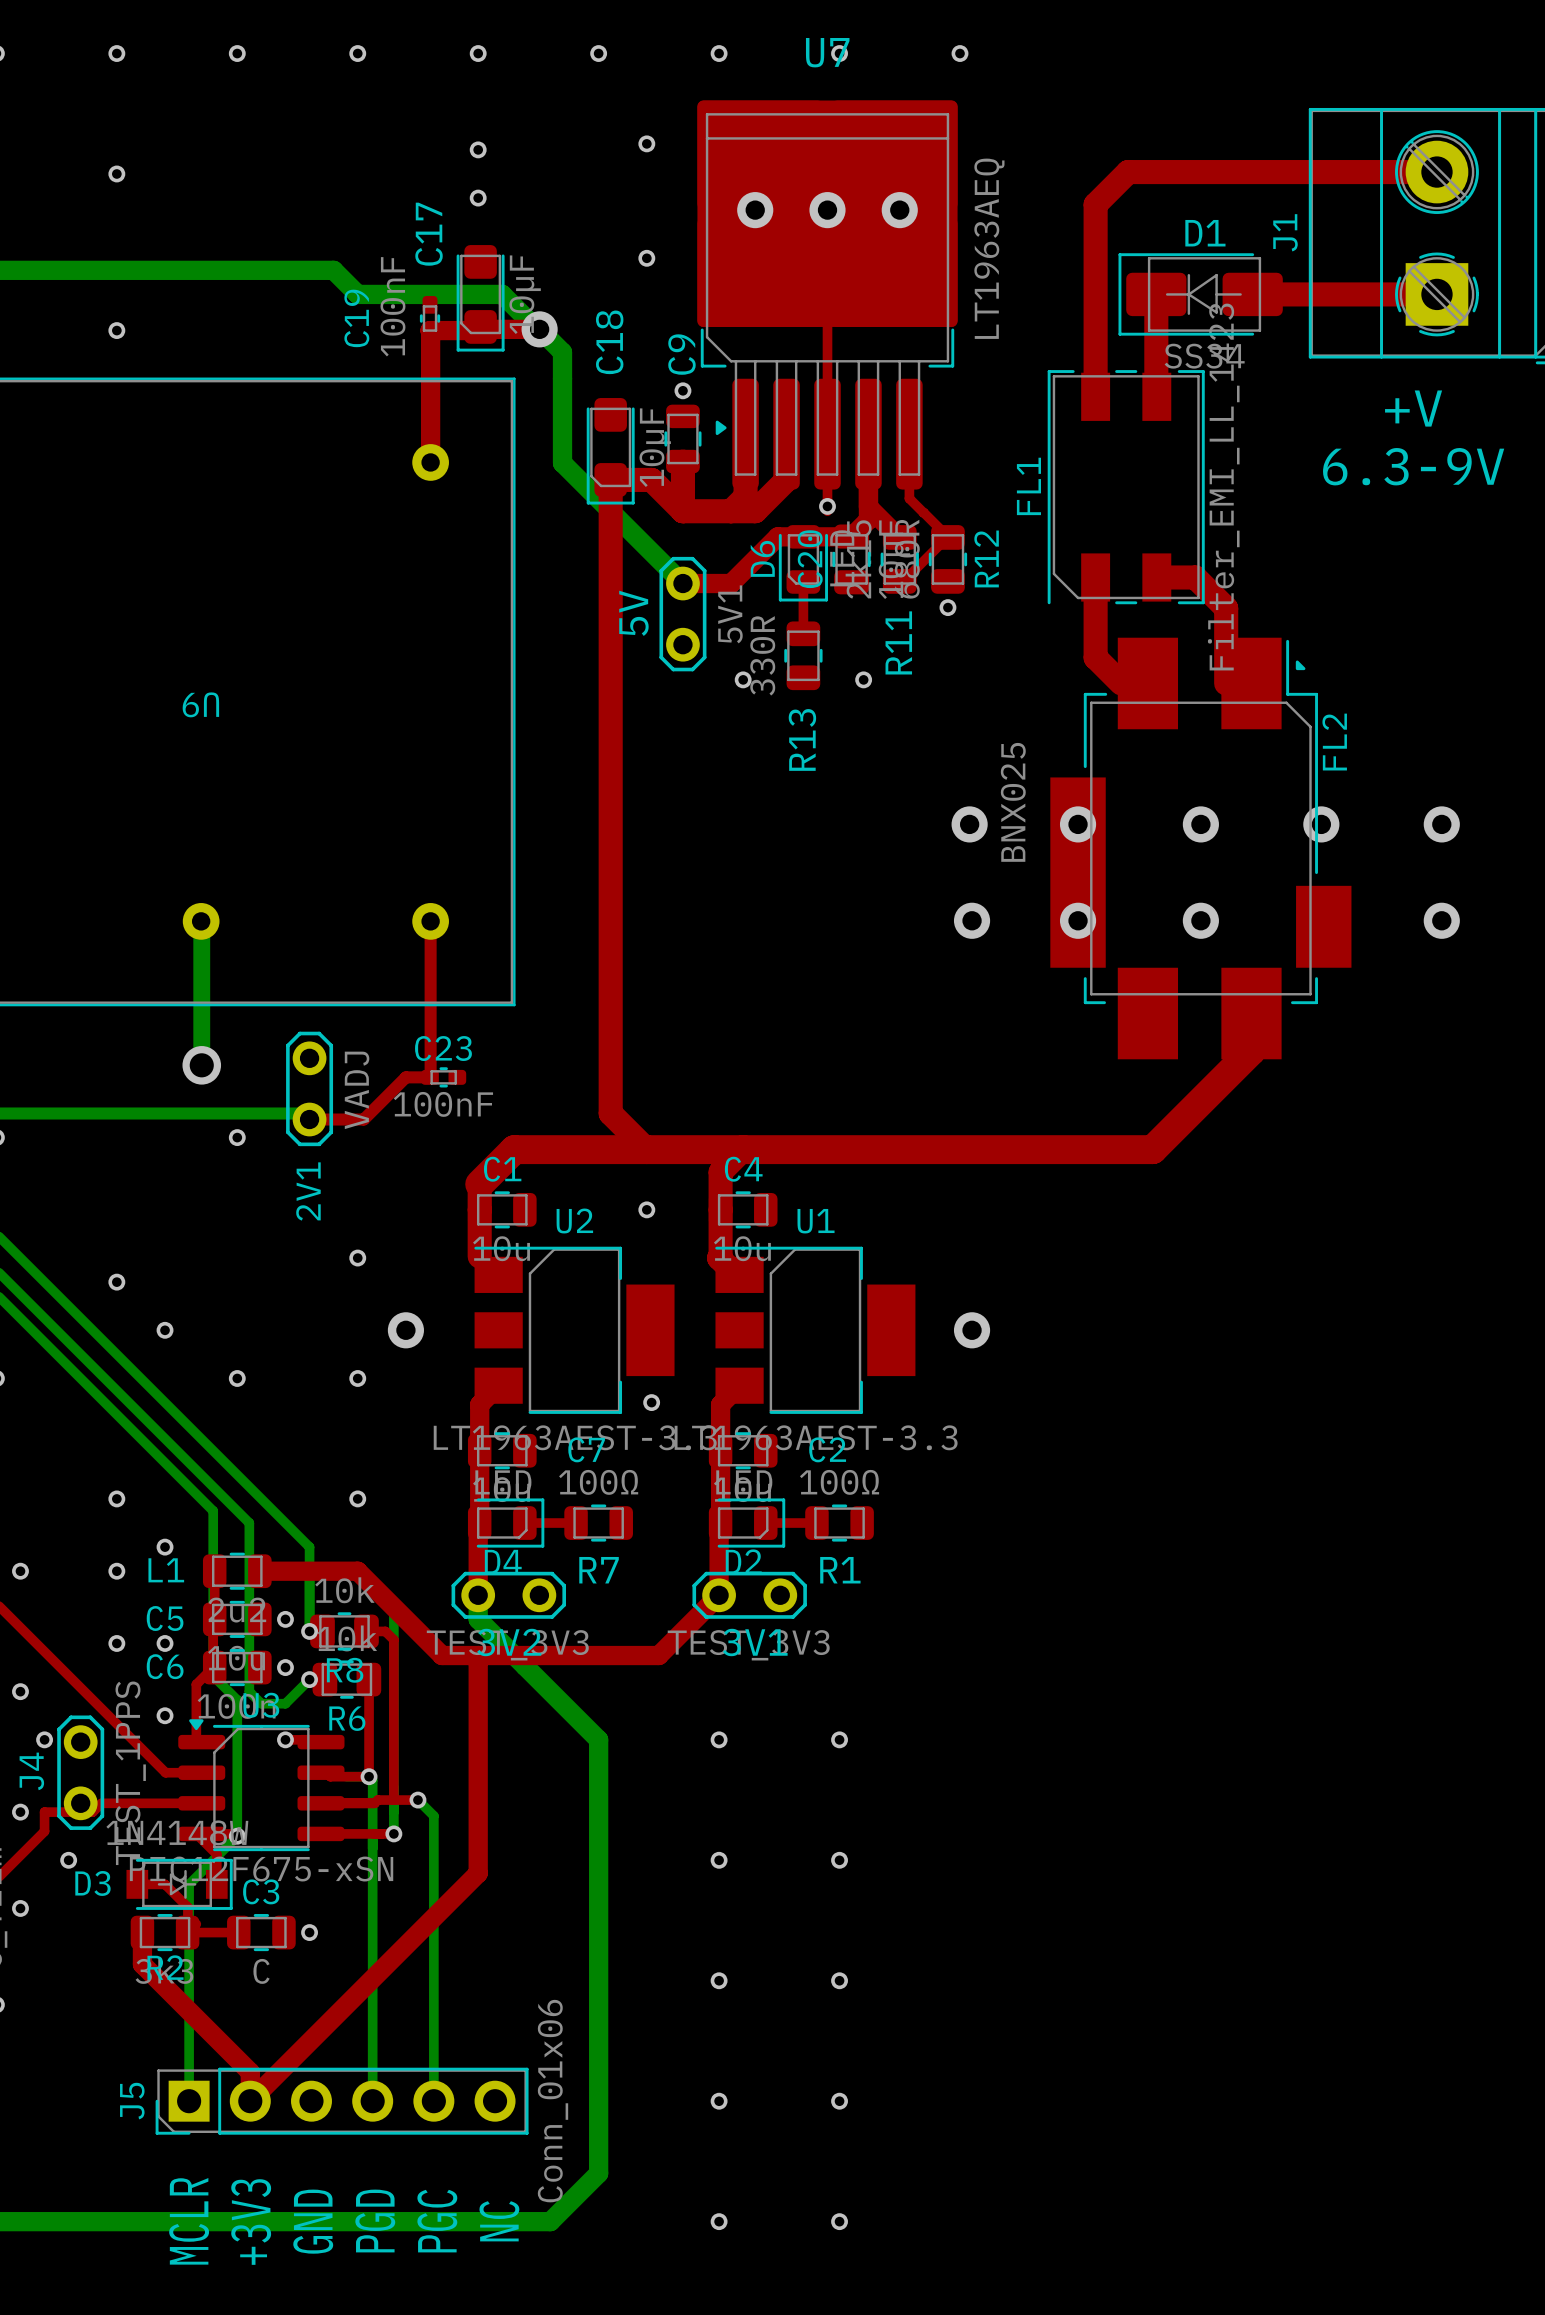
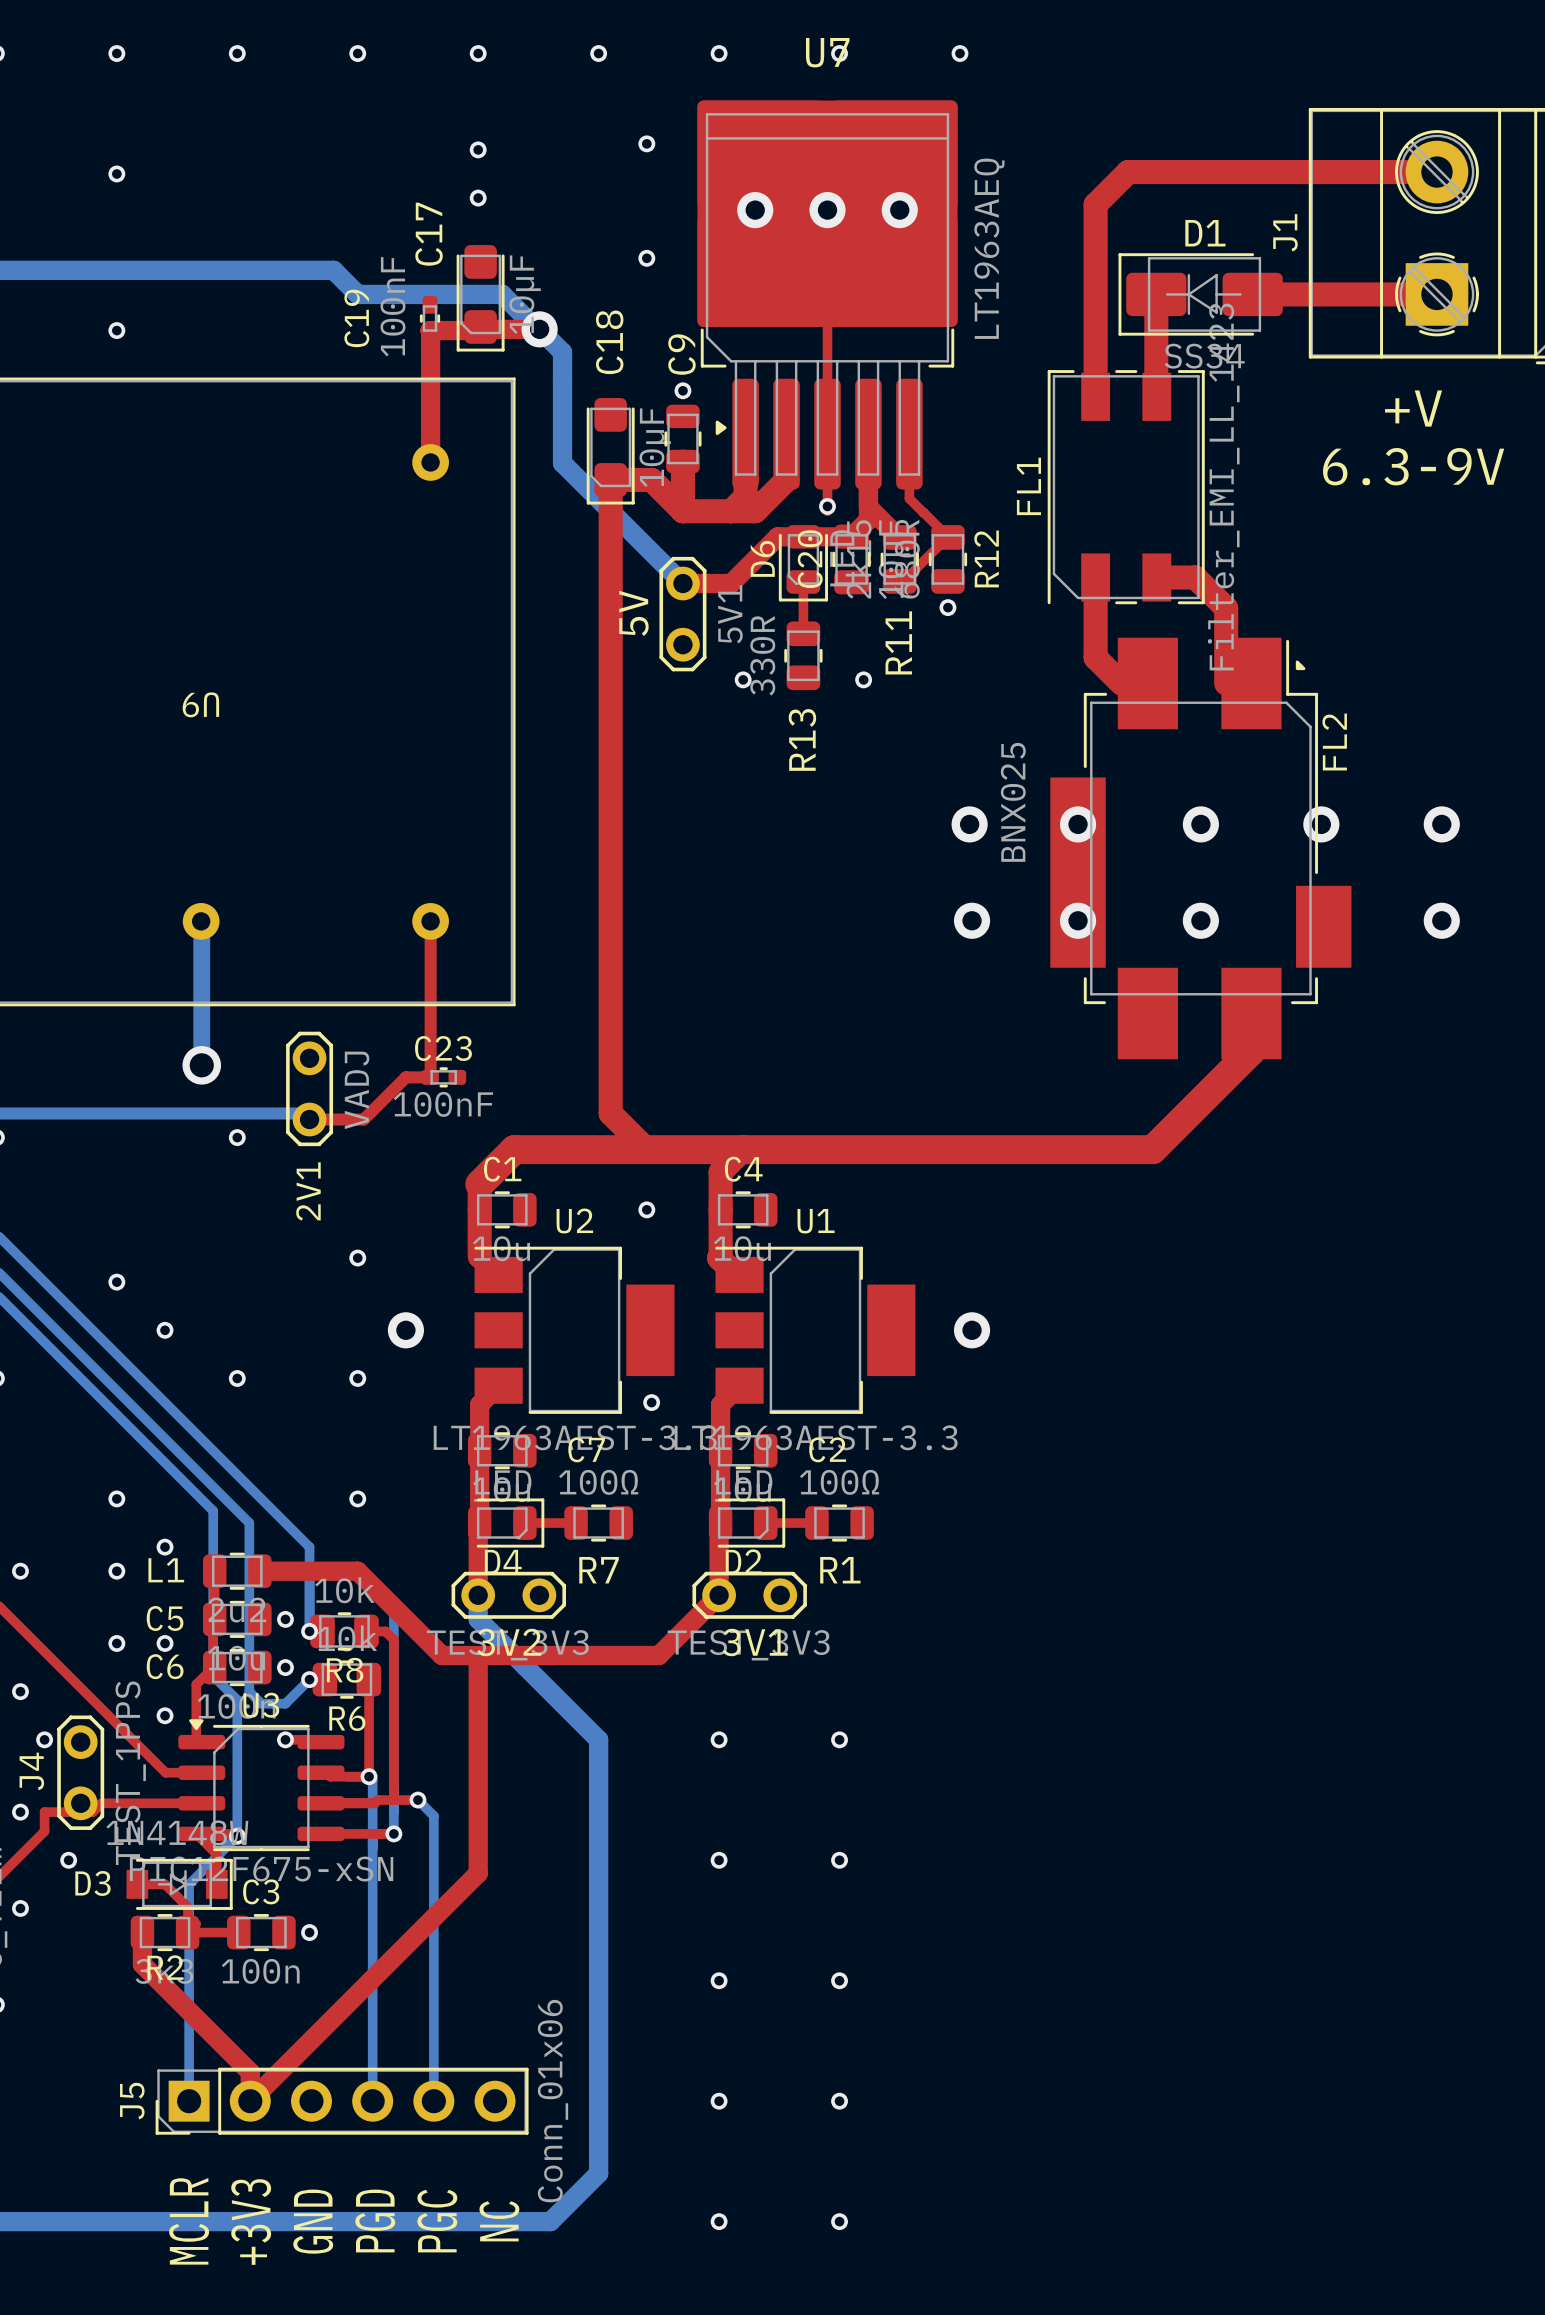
C3 value: C (261, 1971) -> 100n (260, 1971)

